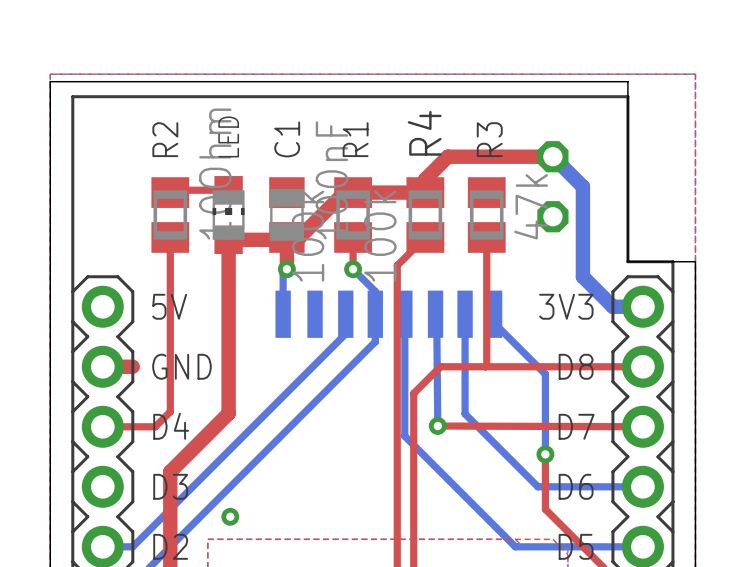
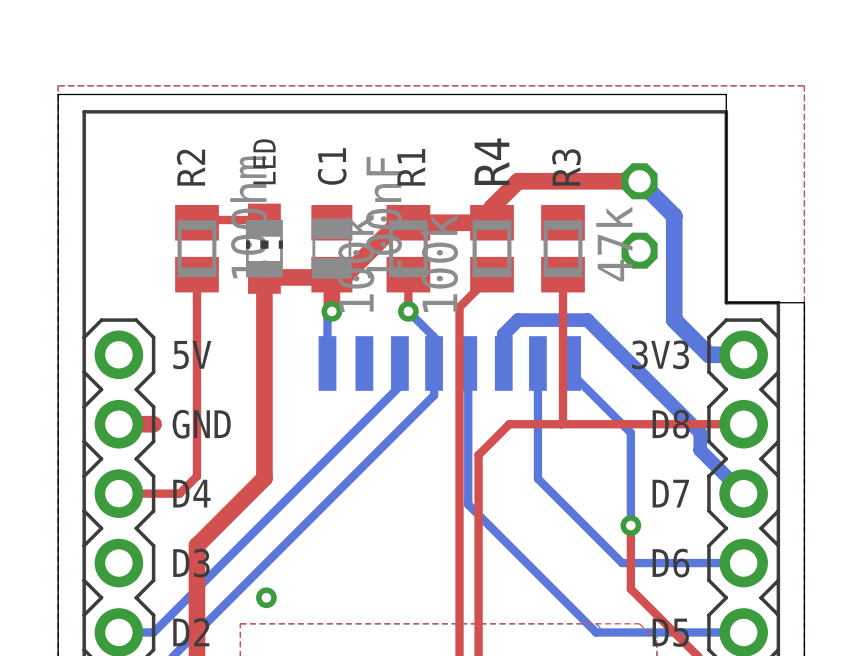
bottom track: none -> (506, 360) (503, 363) (503, 334) (518, 320) (587, 320) (700, 432) (700, 450) (743, 493)
bottom track: (435, 314) (437, 426) -> none
top track: (437, 426) (642, 426) -> none
via: (437, 426) -> none

